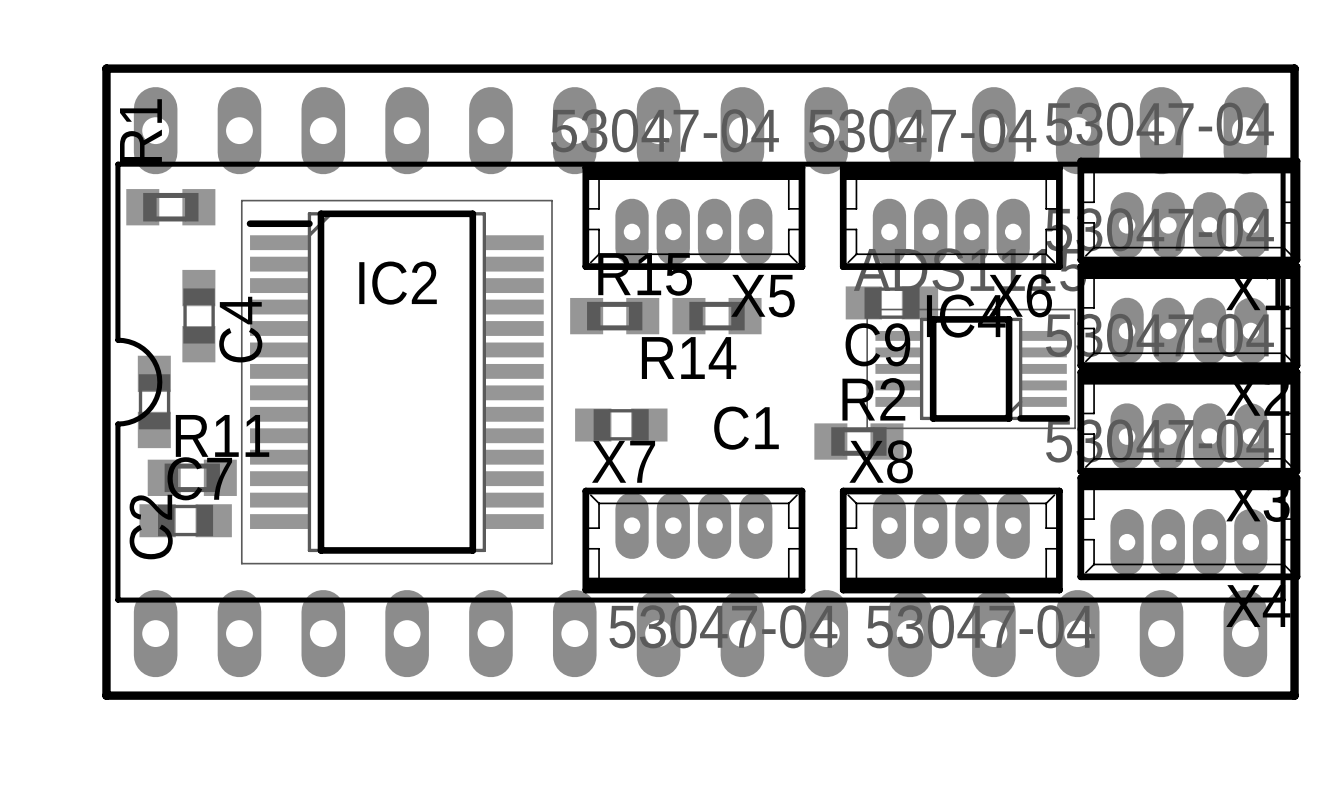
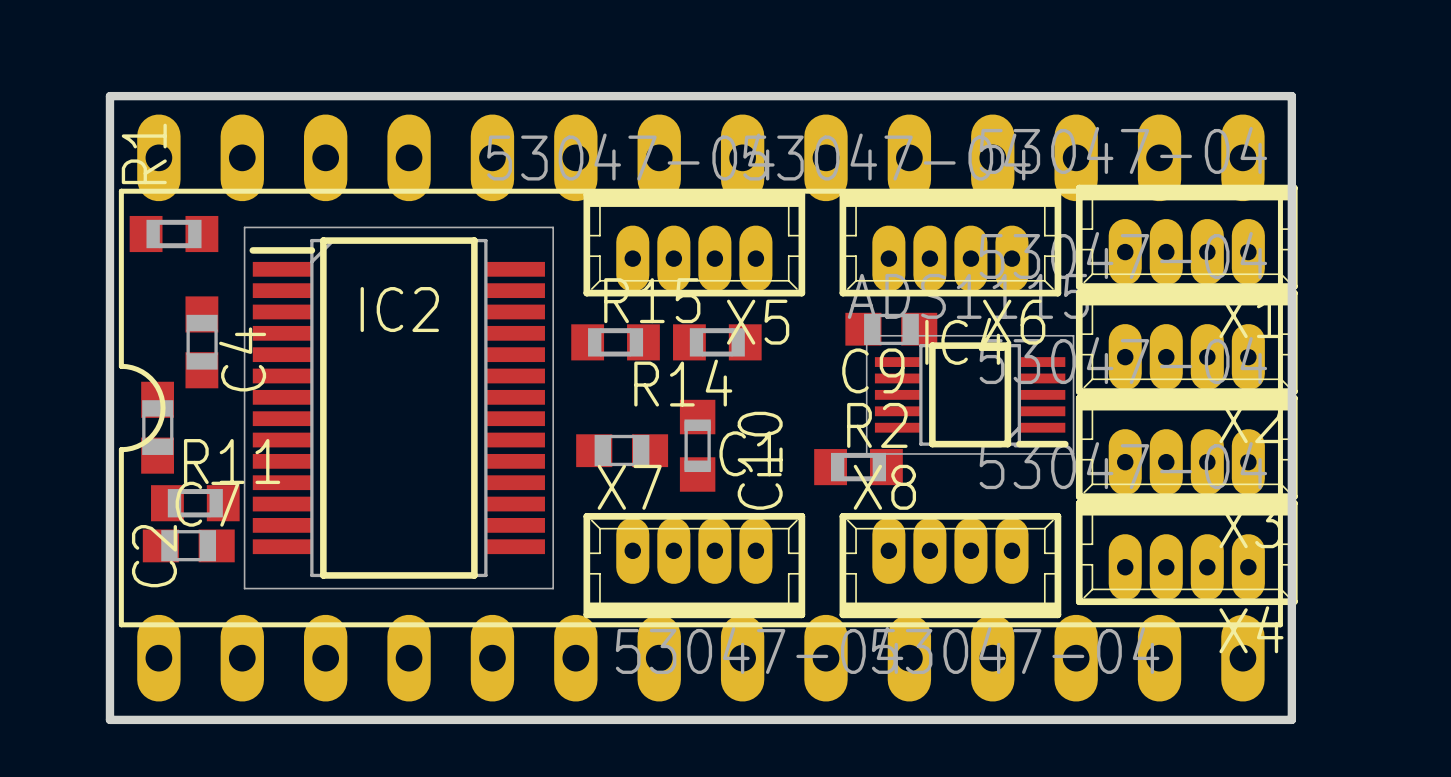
C10: none -> (697, 445)

